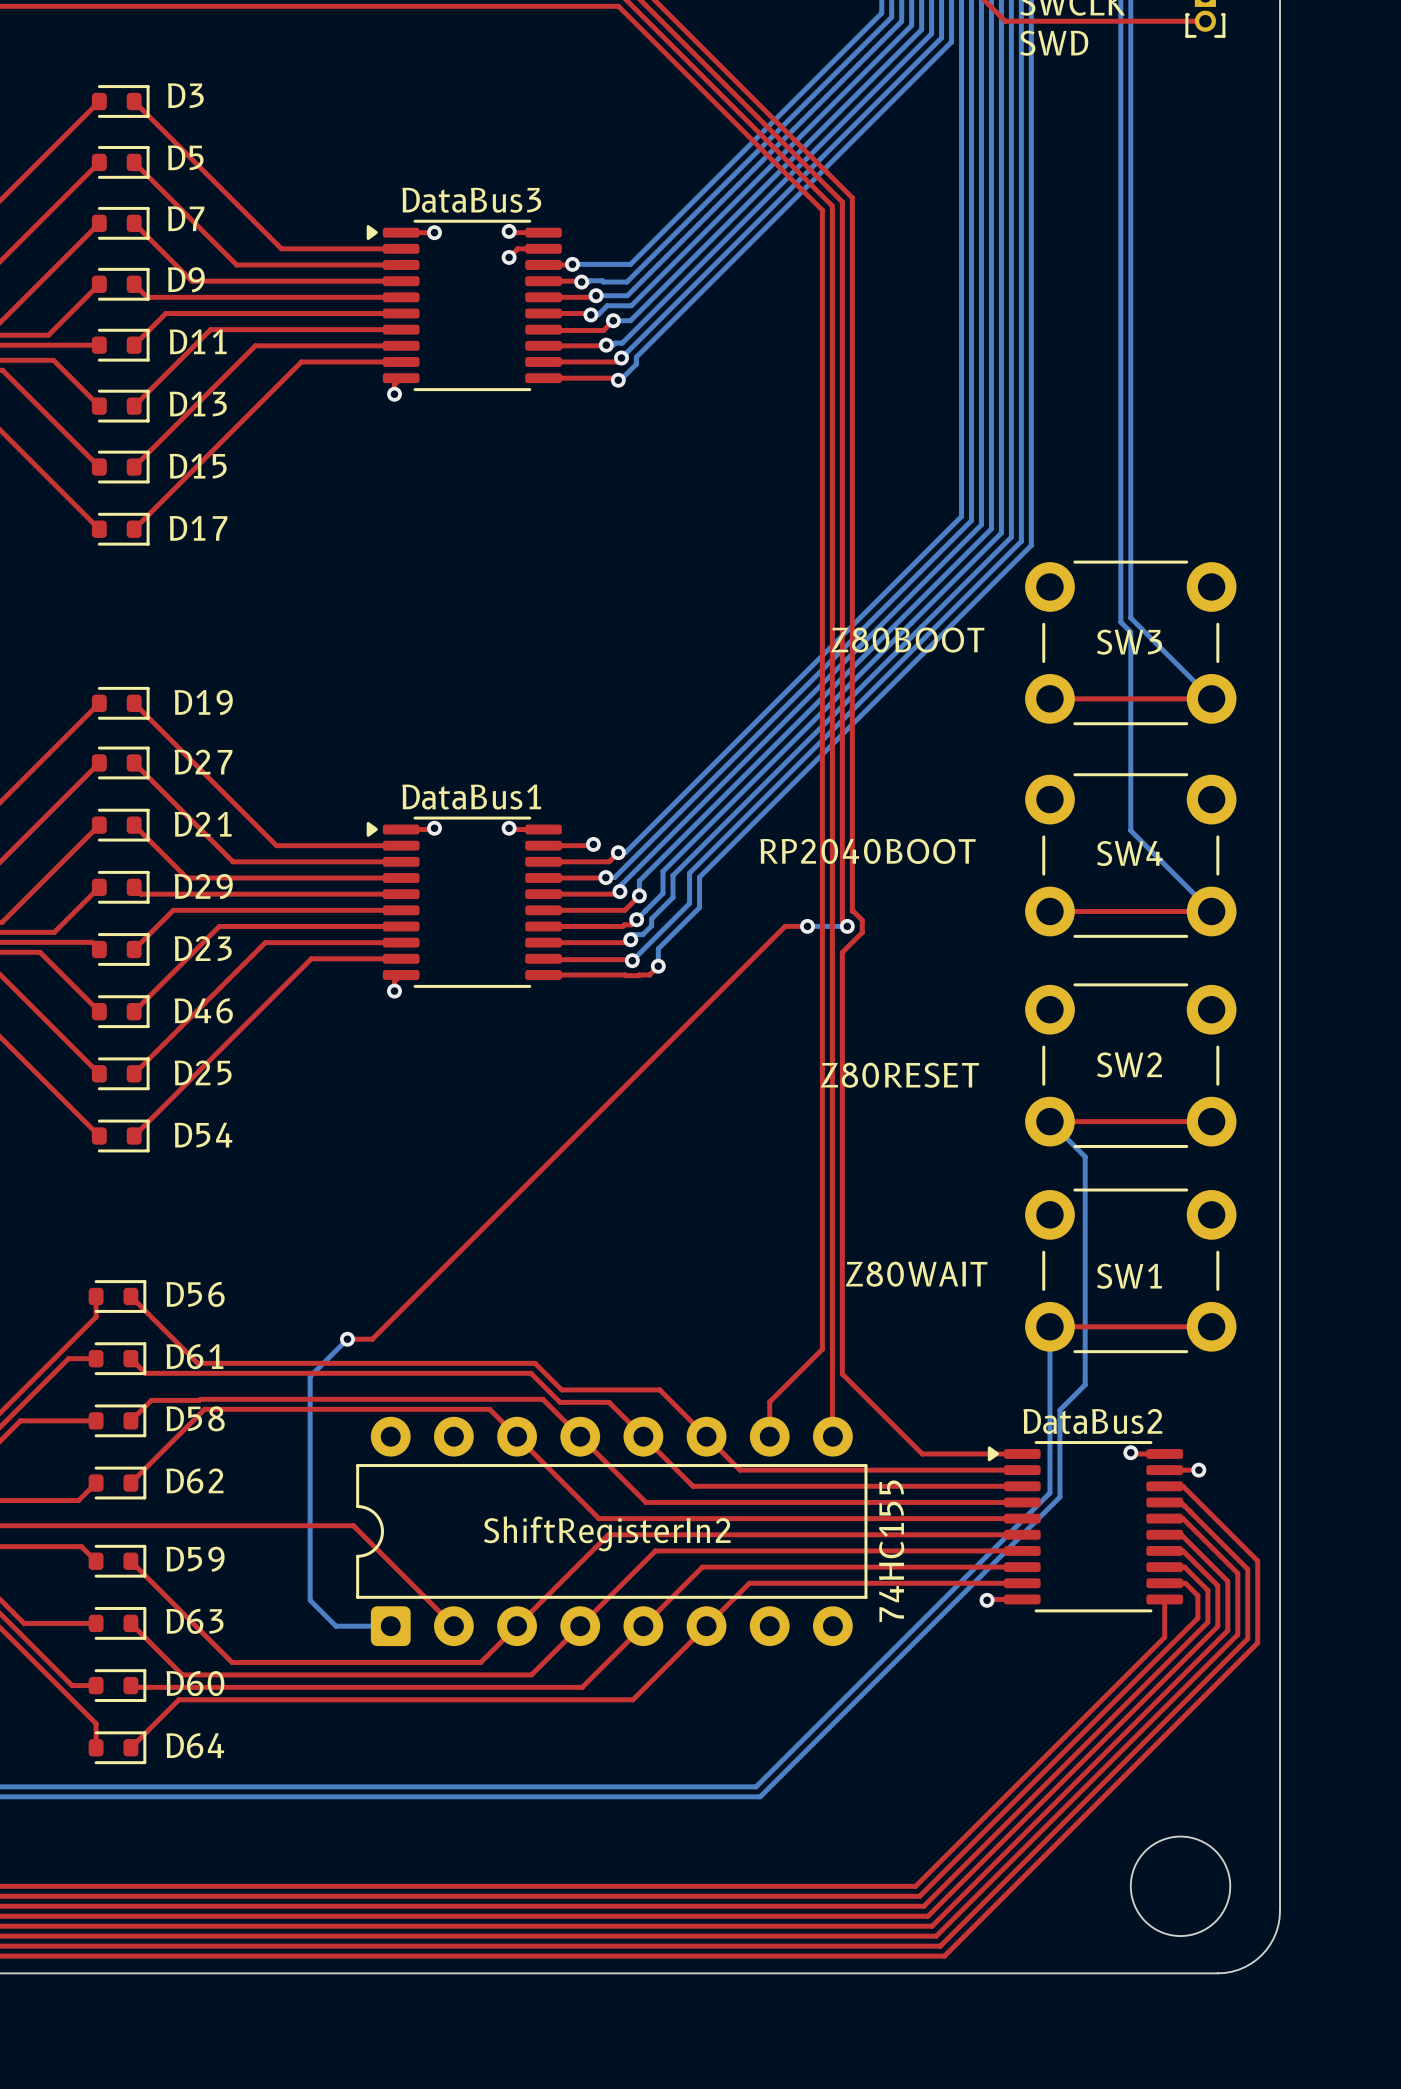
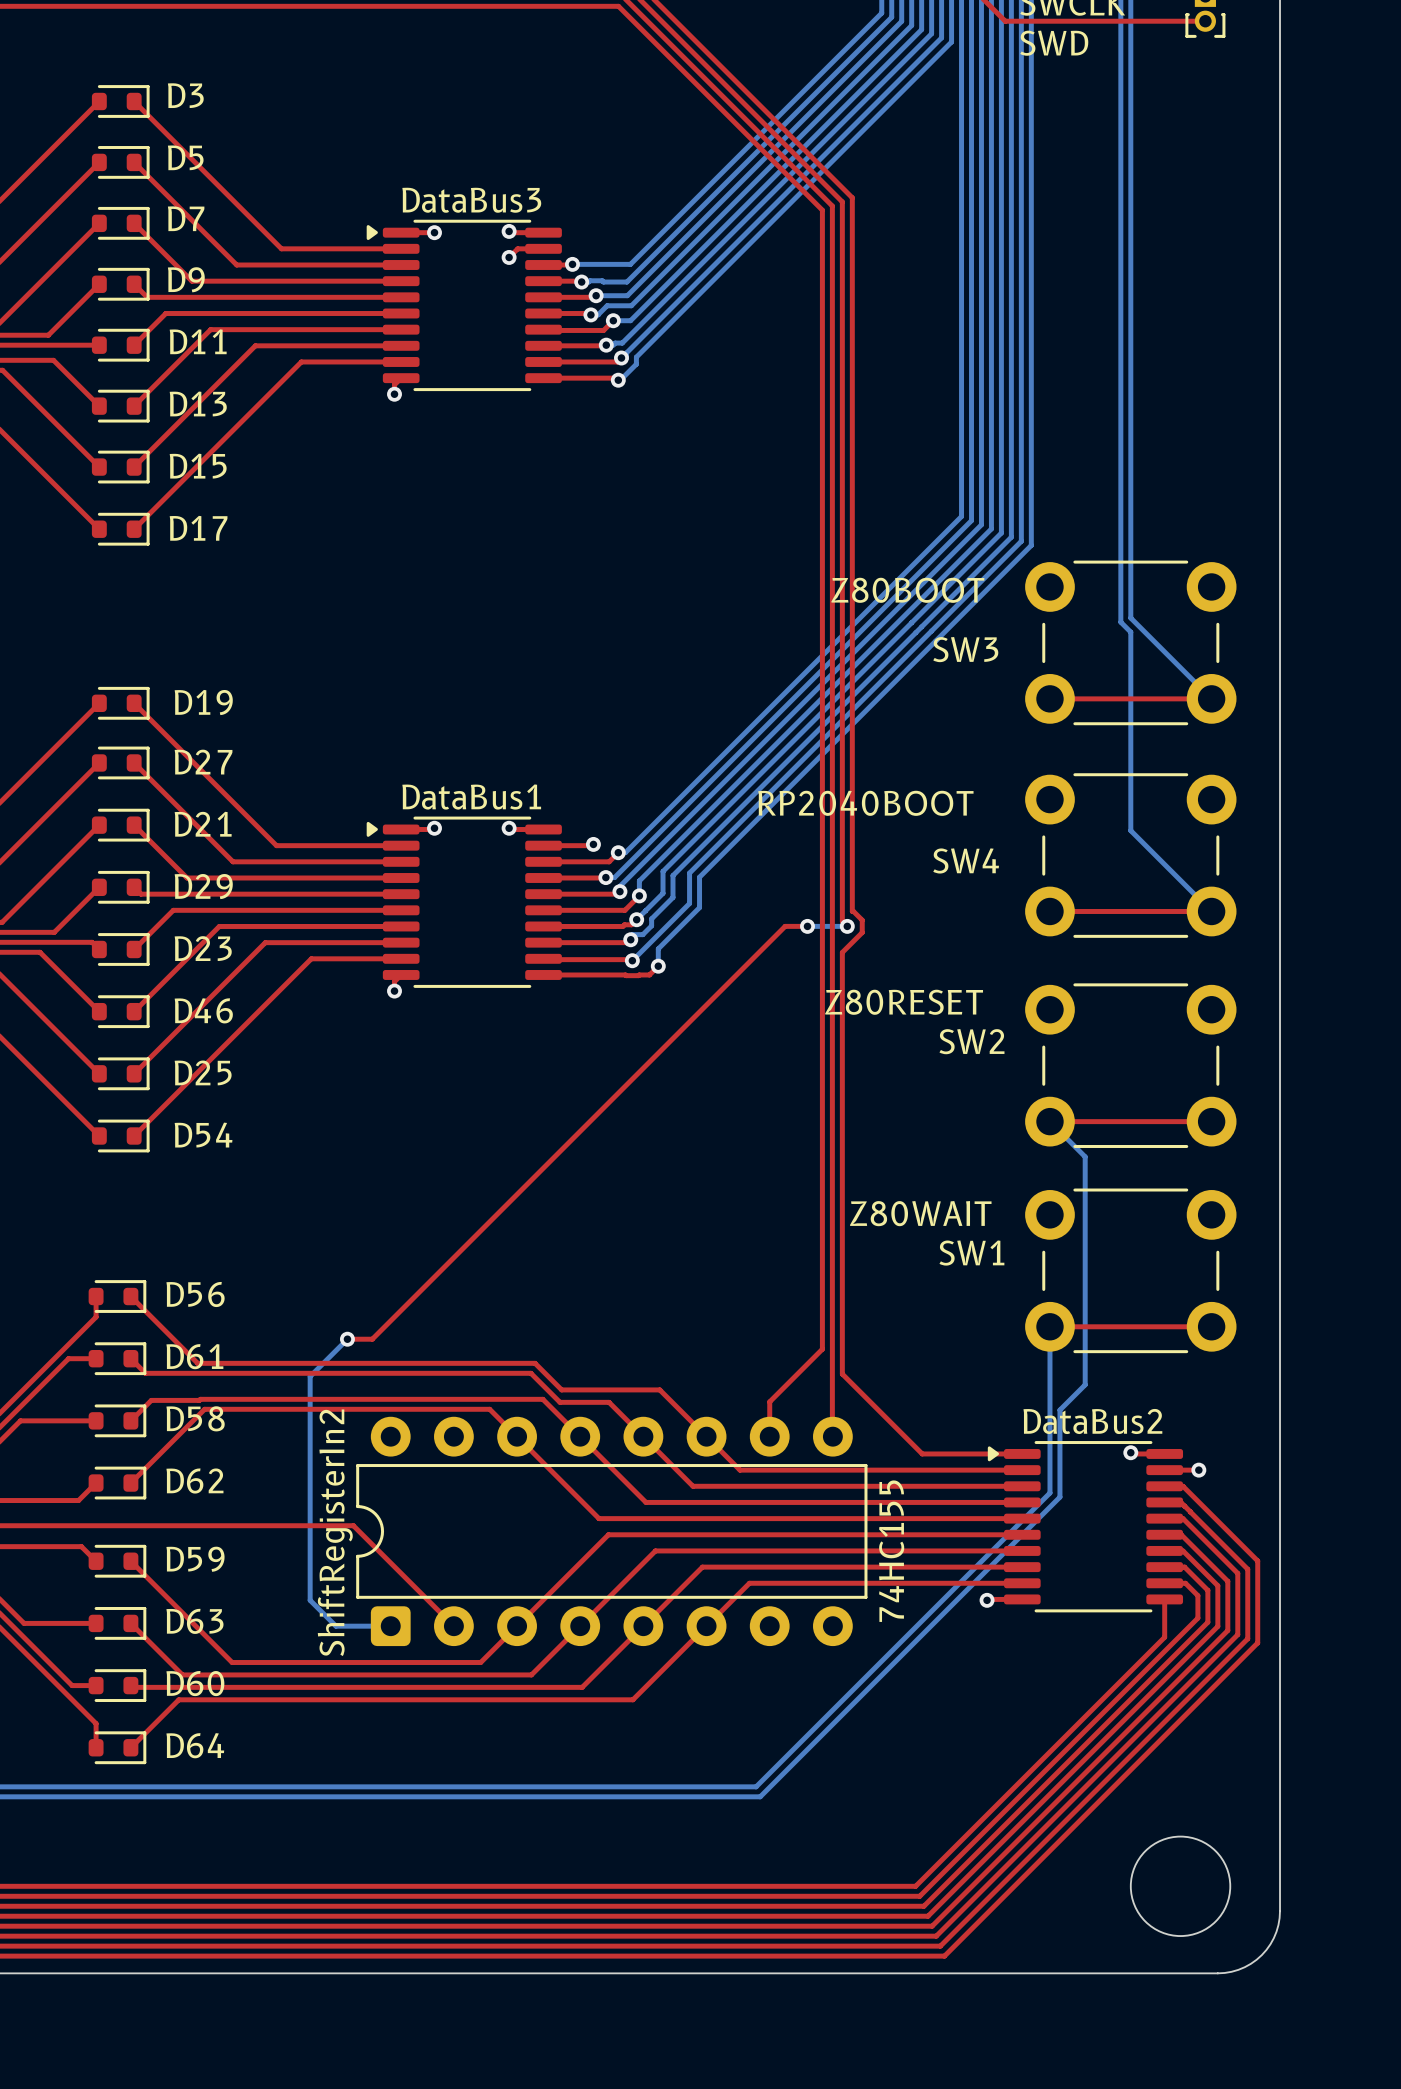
text position: Z80BOOT (907, 640) -> Z80BOOT (907, 590)
SW3 name position: SW3 (1129, 642) -> SW3 (965, 649)
text position: RP2040BOOT (867, 851) -> RP2040BOOT (865, 803)
SW4 name position: SW4 (1129, 853) -> SW4 (966, 860)
SW2 name position: SW2 (1129, 1064) -> SW2 (971, 1041)
text position: Z80RESET (899, 1075) -> Z80RESET (904, 1002)
text position: Z80WAIT (916, 1274) -> Z80WAIT (920, 1213)
SW1 name position: SW1 (1129, 1276) -> SW1 (971, 1253)
ShiftRegisterIn2 name rotation: 0° (607, 1533) -> 90° counterclockwise (335, 1532)

